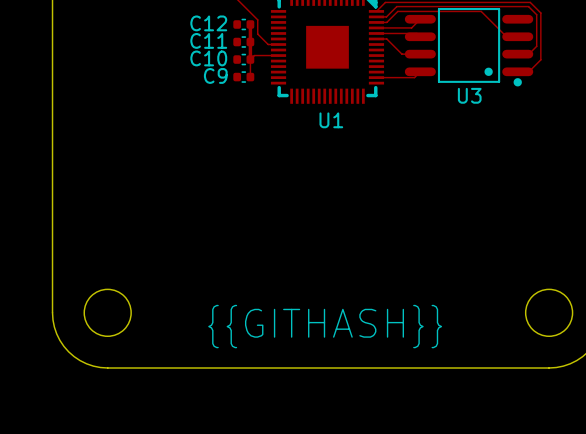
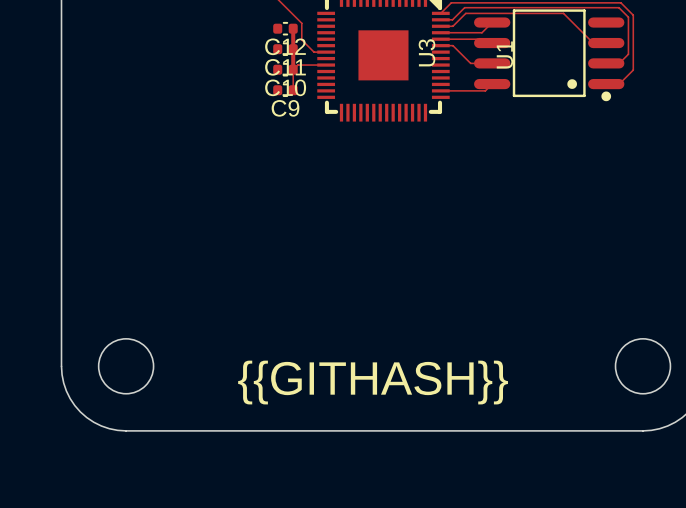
C12 name position: C12 (208, 23) -> C12 (285, 46)
C11 name position: C11 (208, 40) -> C11 (285, 67)
C10 name position: C10 (208, 58) -> C10 (285, 87)
C9 name position: C9 (215, 75) -> C9 (285, 108)
U3 name rotation: 0° (469, 95) -> 90° counterclockwise (426, 52)
U3 name position: U3 (469, 95) -> U3 (426, 52)
U1 name rotation: 0° (331, 120) -> 90° counterclockwise (504, 55)
U1 name position: U1 (331, 120) -> U1 (504, 55)

